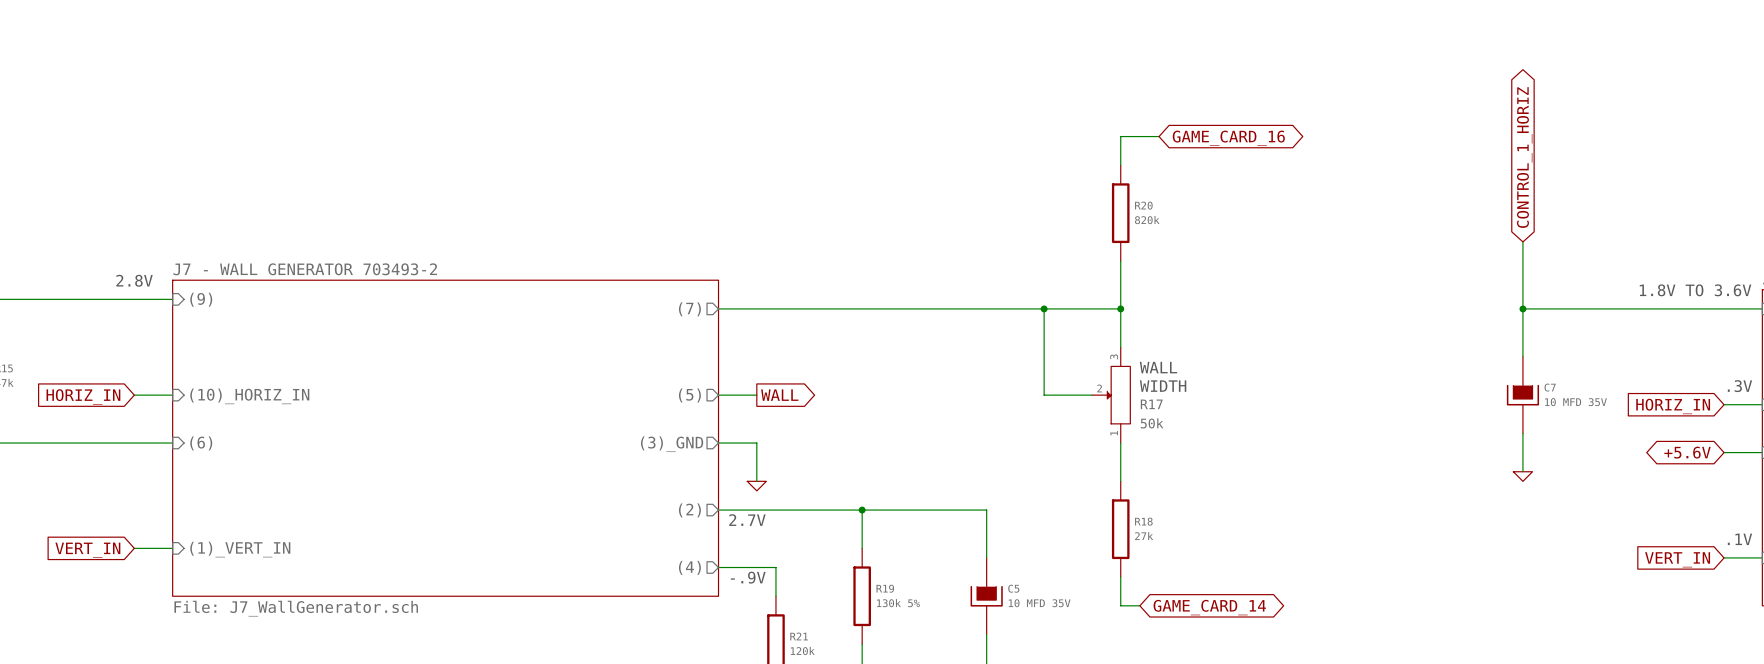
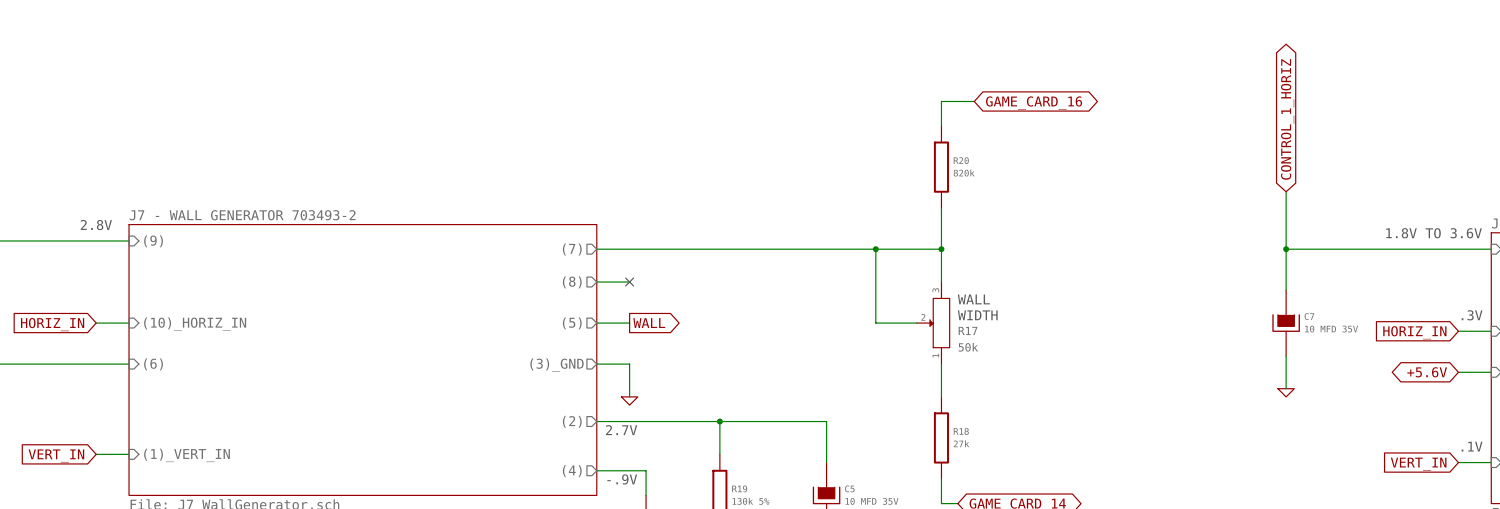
sheet pin: none -> (8) (572, 282)
wire: none -> (596, 282) (629, 282)
no-connect mark: none -> (629, 282)

